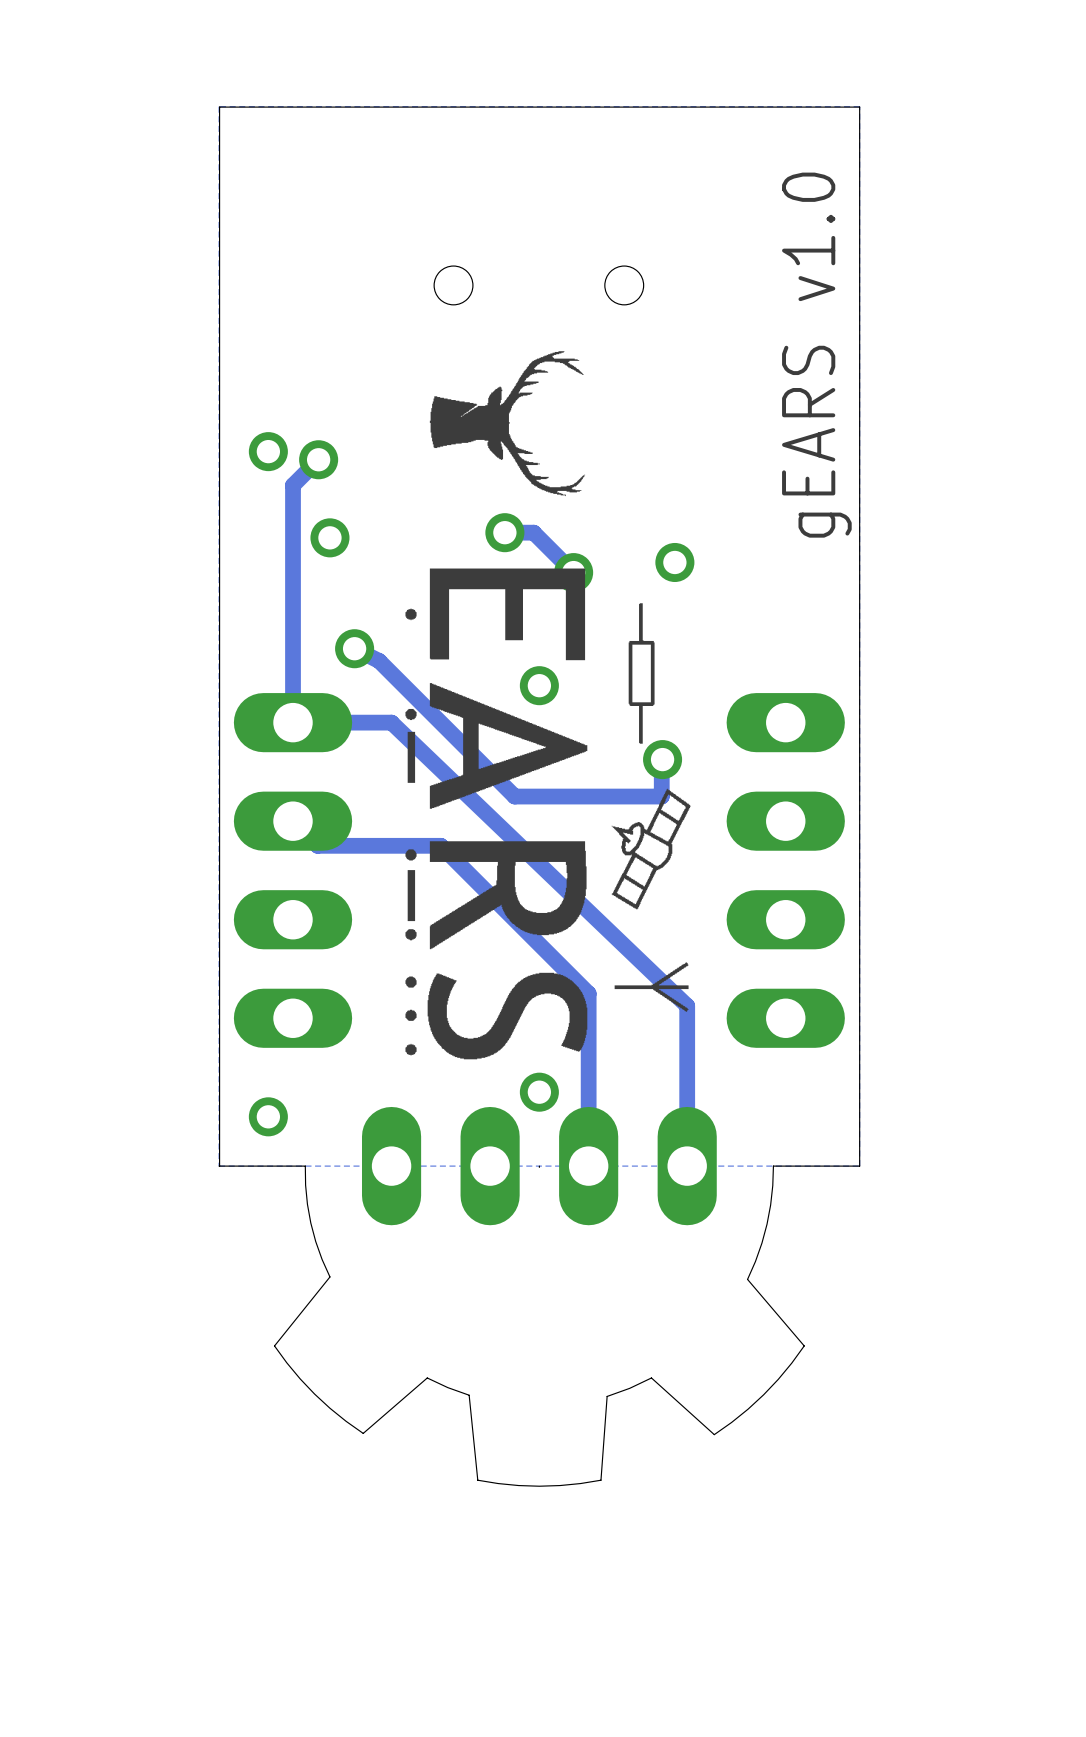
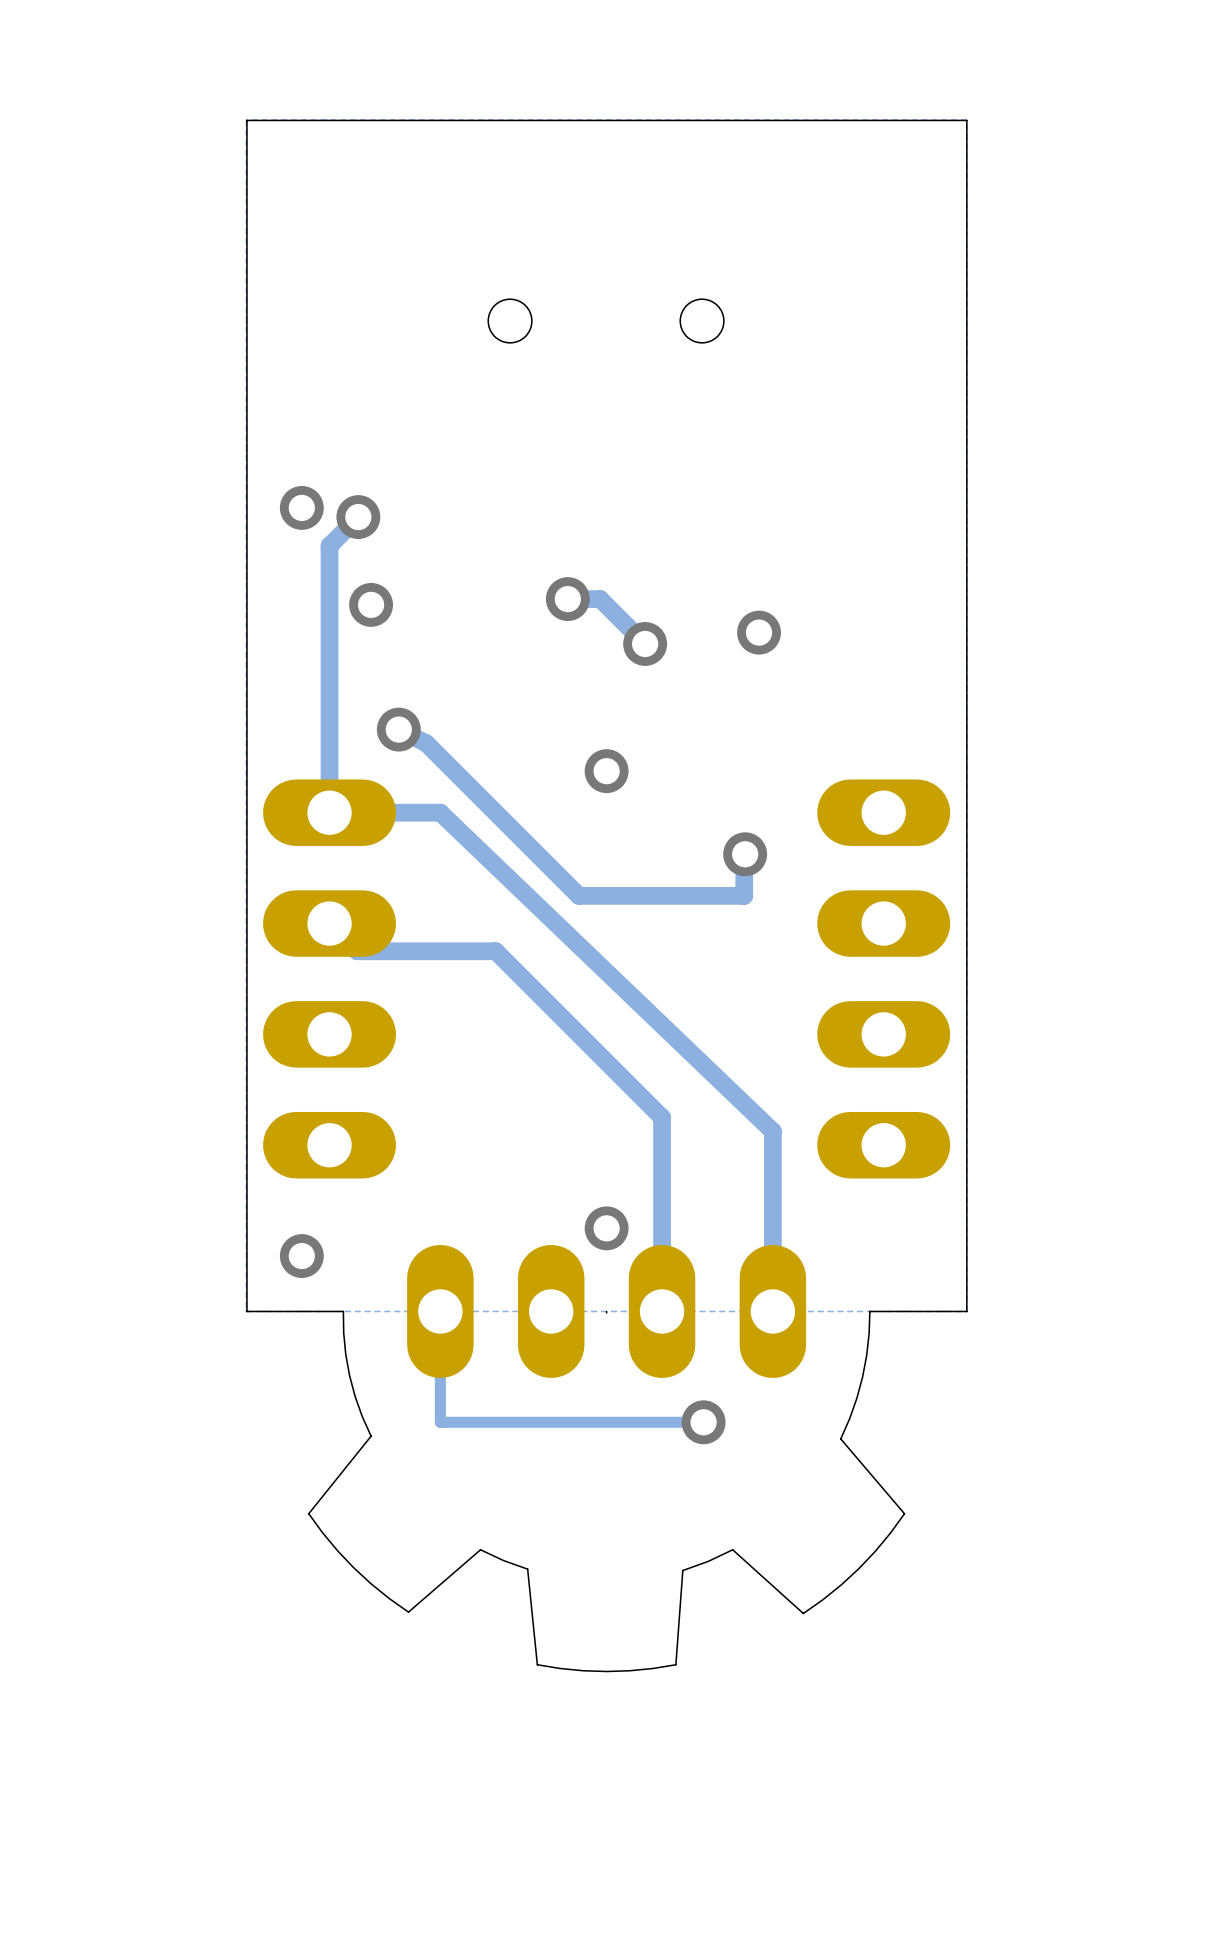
drawing: [429, 351, 586, 497] -> none
text: gEARS v1.0 (816, 355) -> none
drawing: [405, 568, 691, 1060] -> none
track: none -> (440, 1311) (440, 1422) (703, 1422)
via: none -> (703, 1422)

